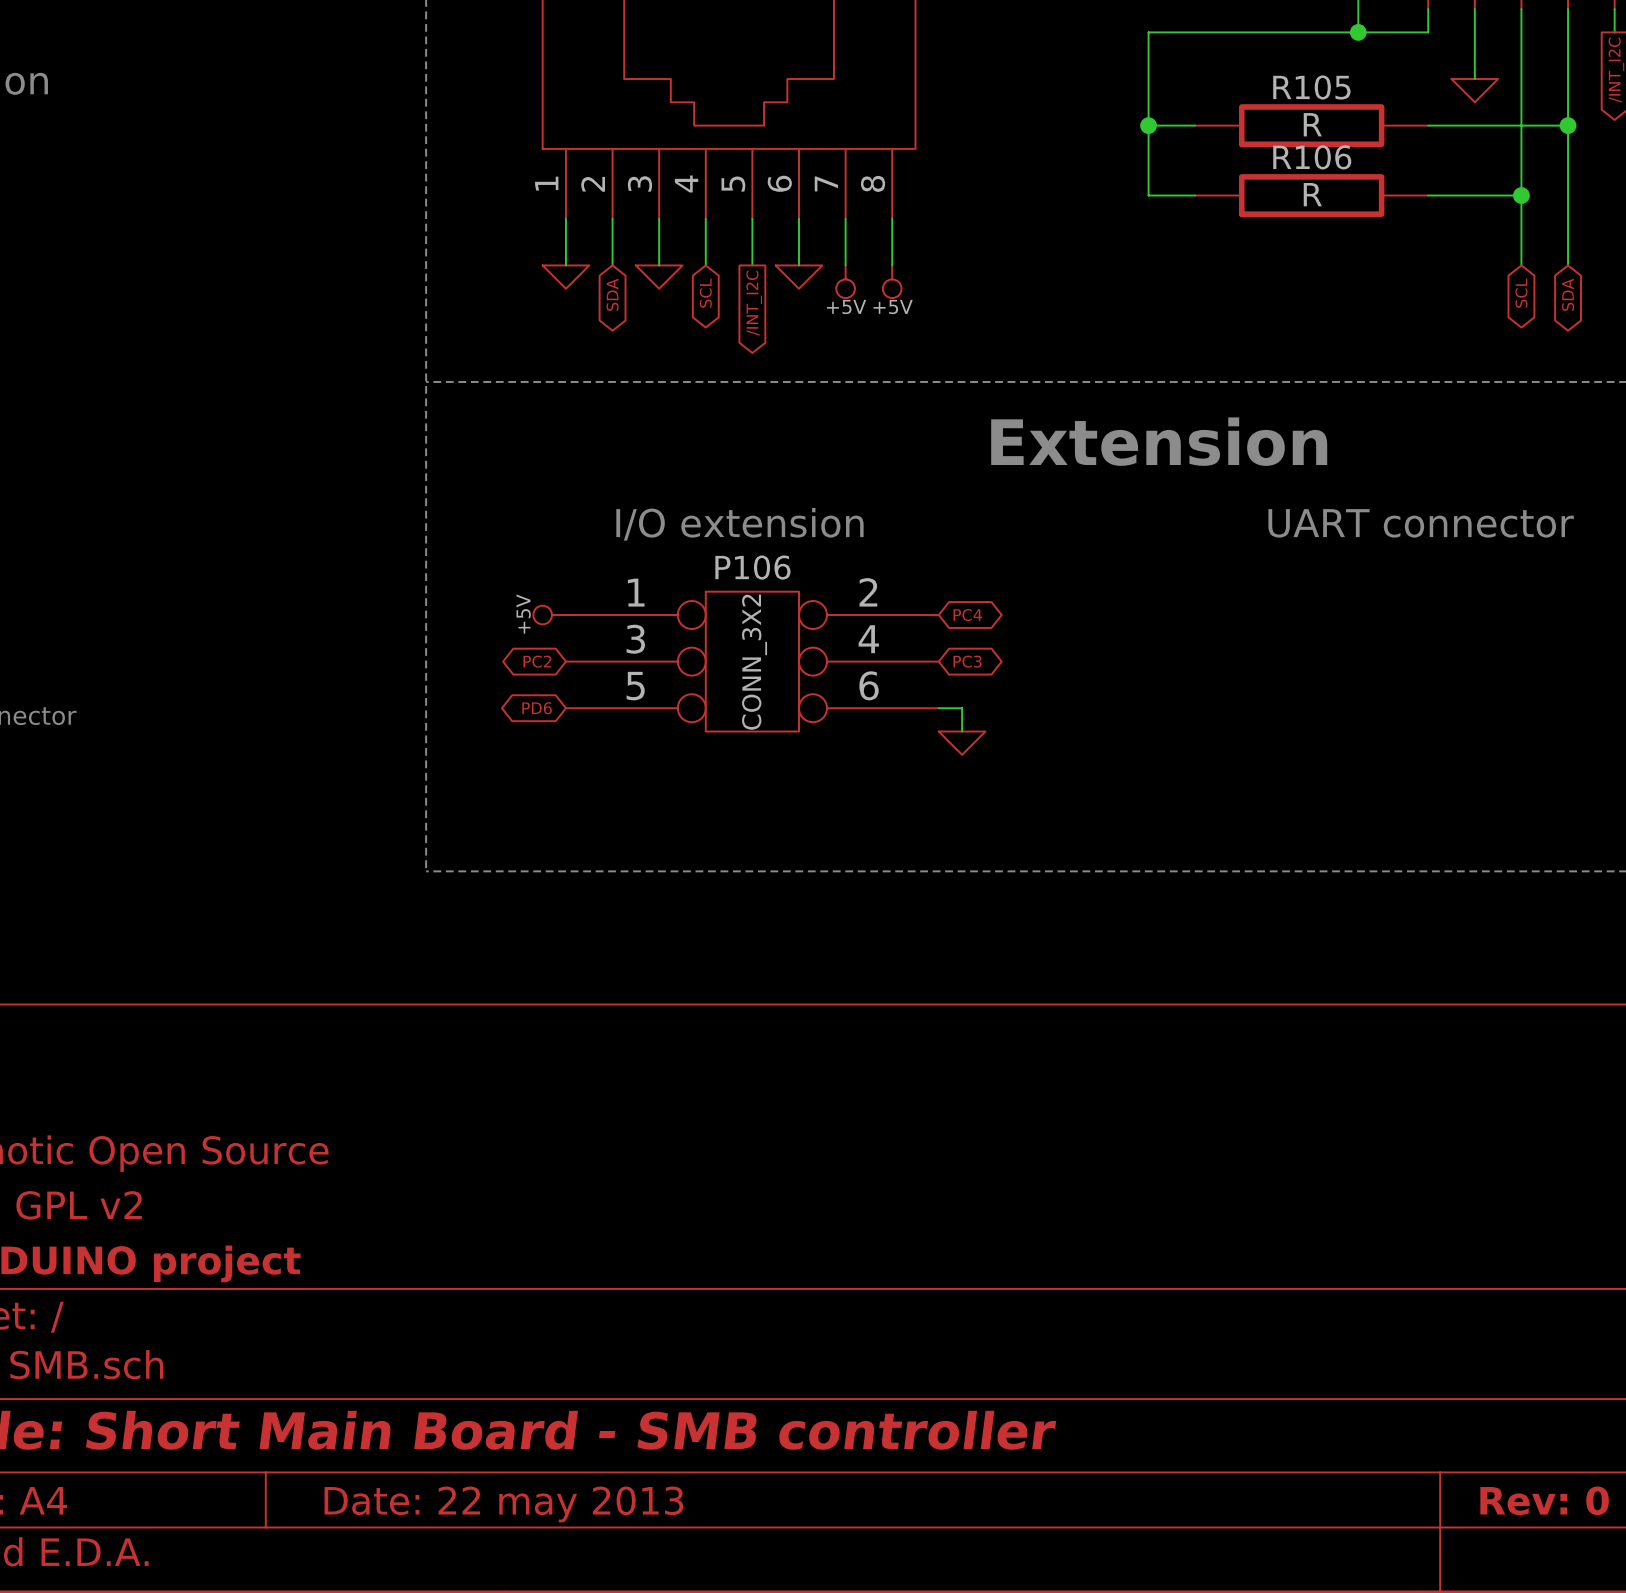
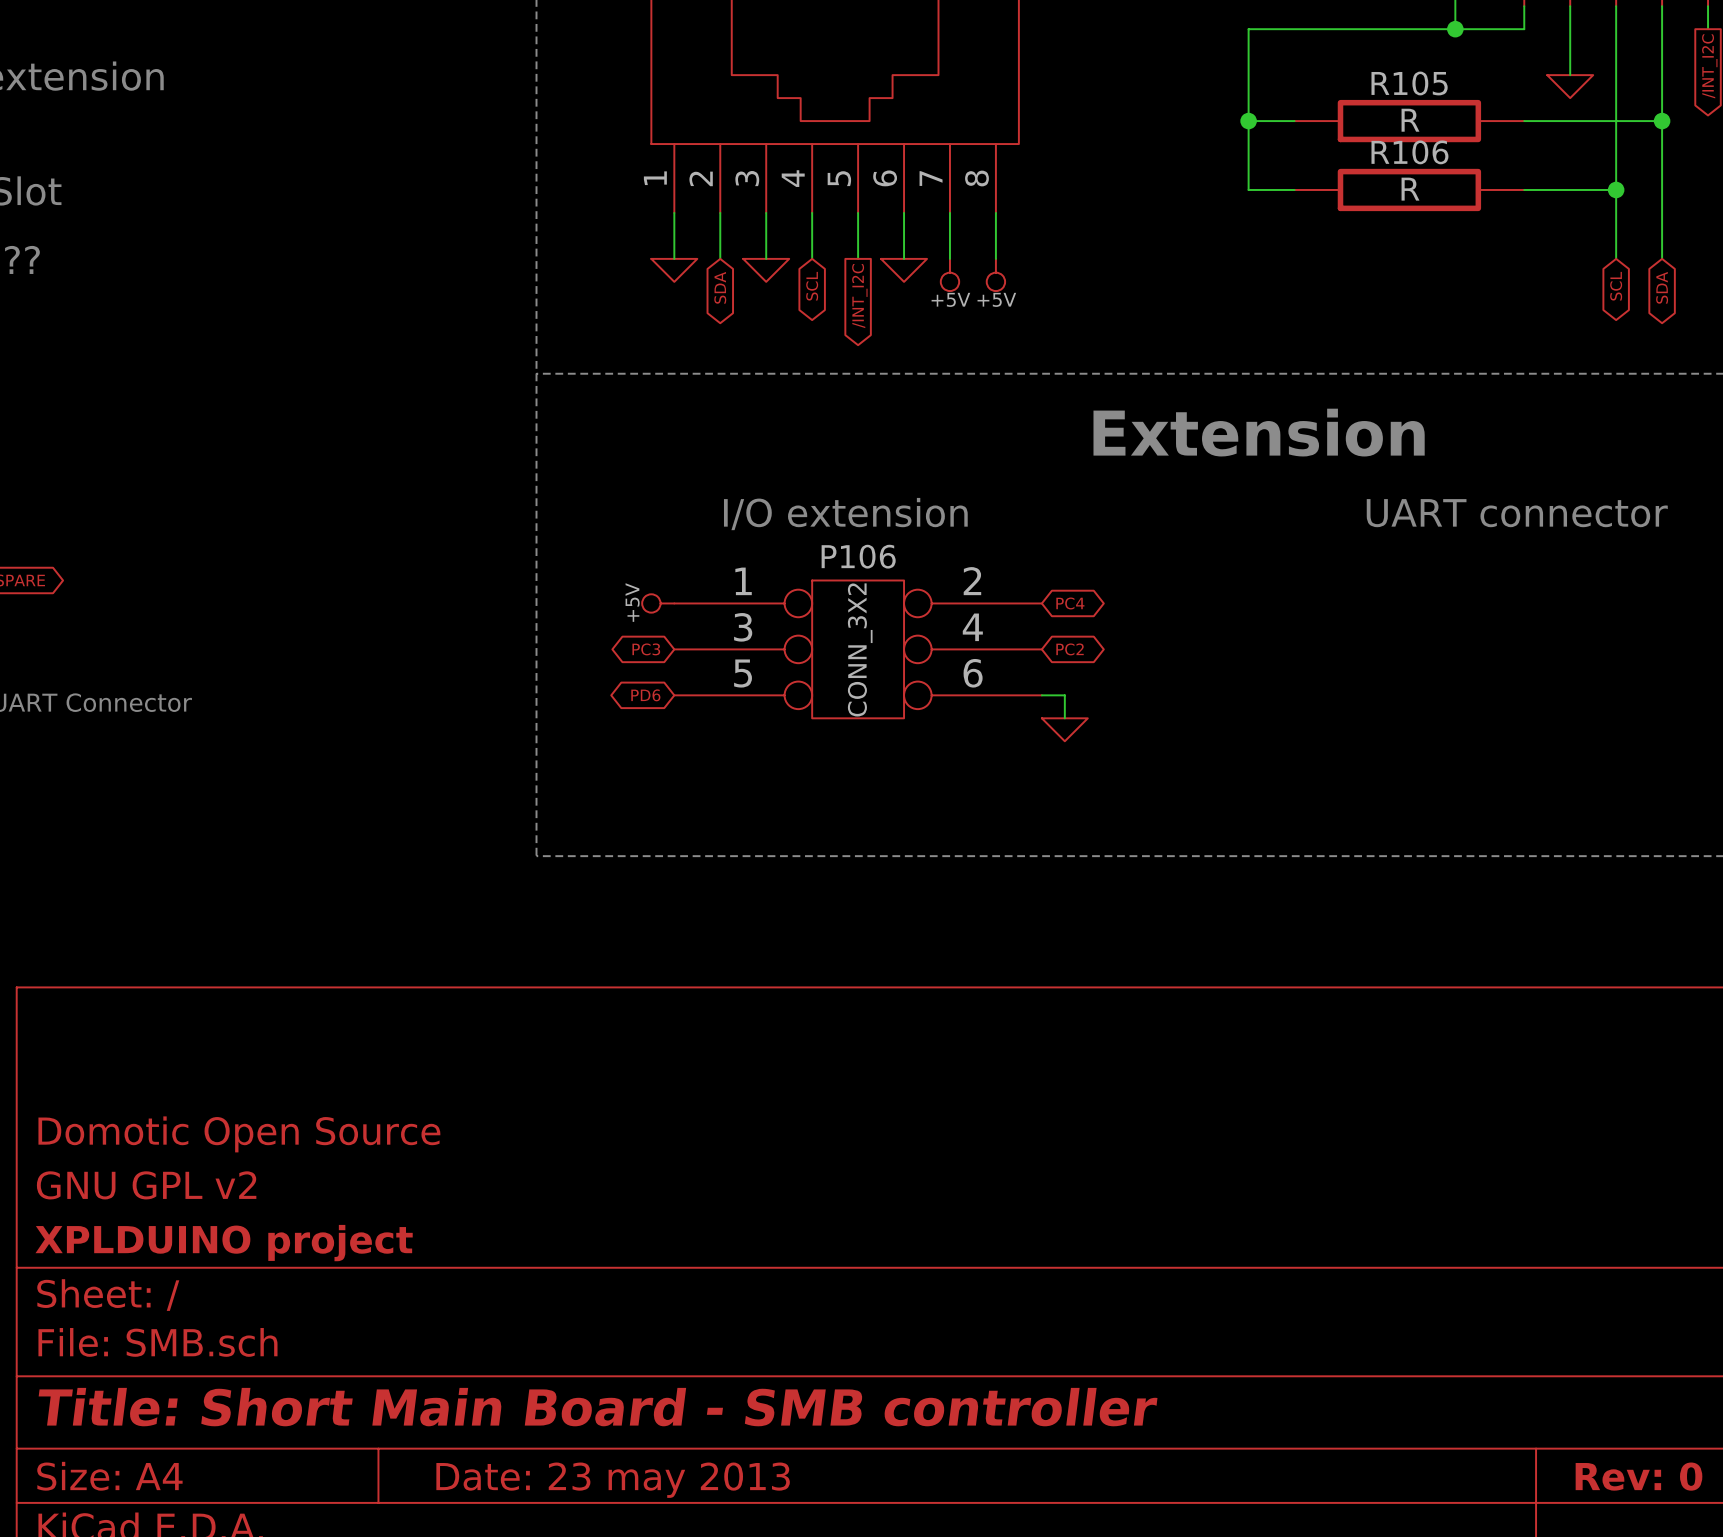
global label: PC2 (537, 661) -> PC3 (646, 649)
global label: PC3 (967, 661) -> PC2 (1070, 649)
title block: Date: 22 may 2013 (503, 1504) -> Date: 23 may 2013 (613, 1480)

